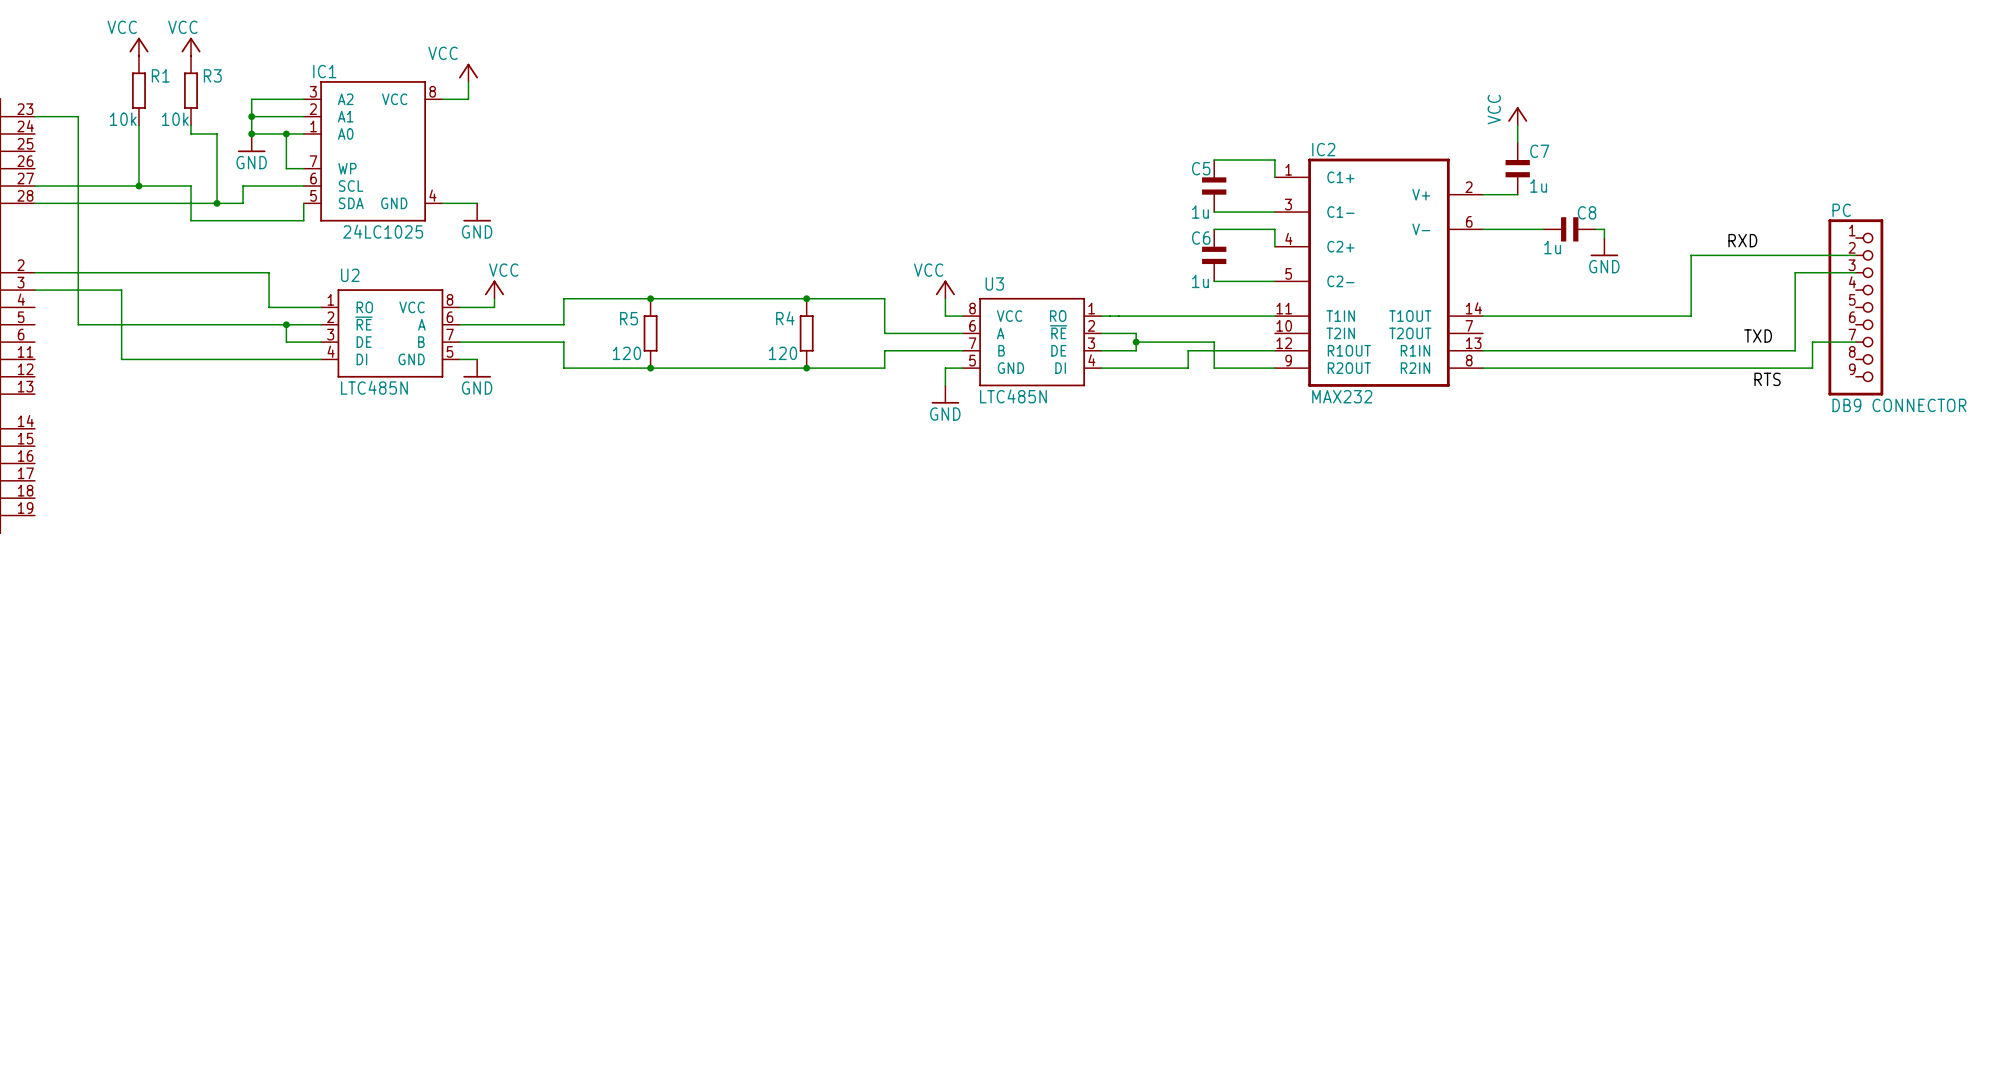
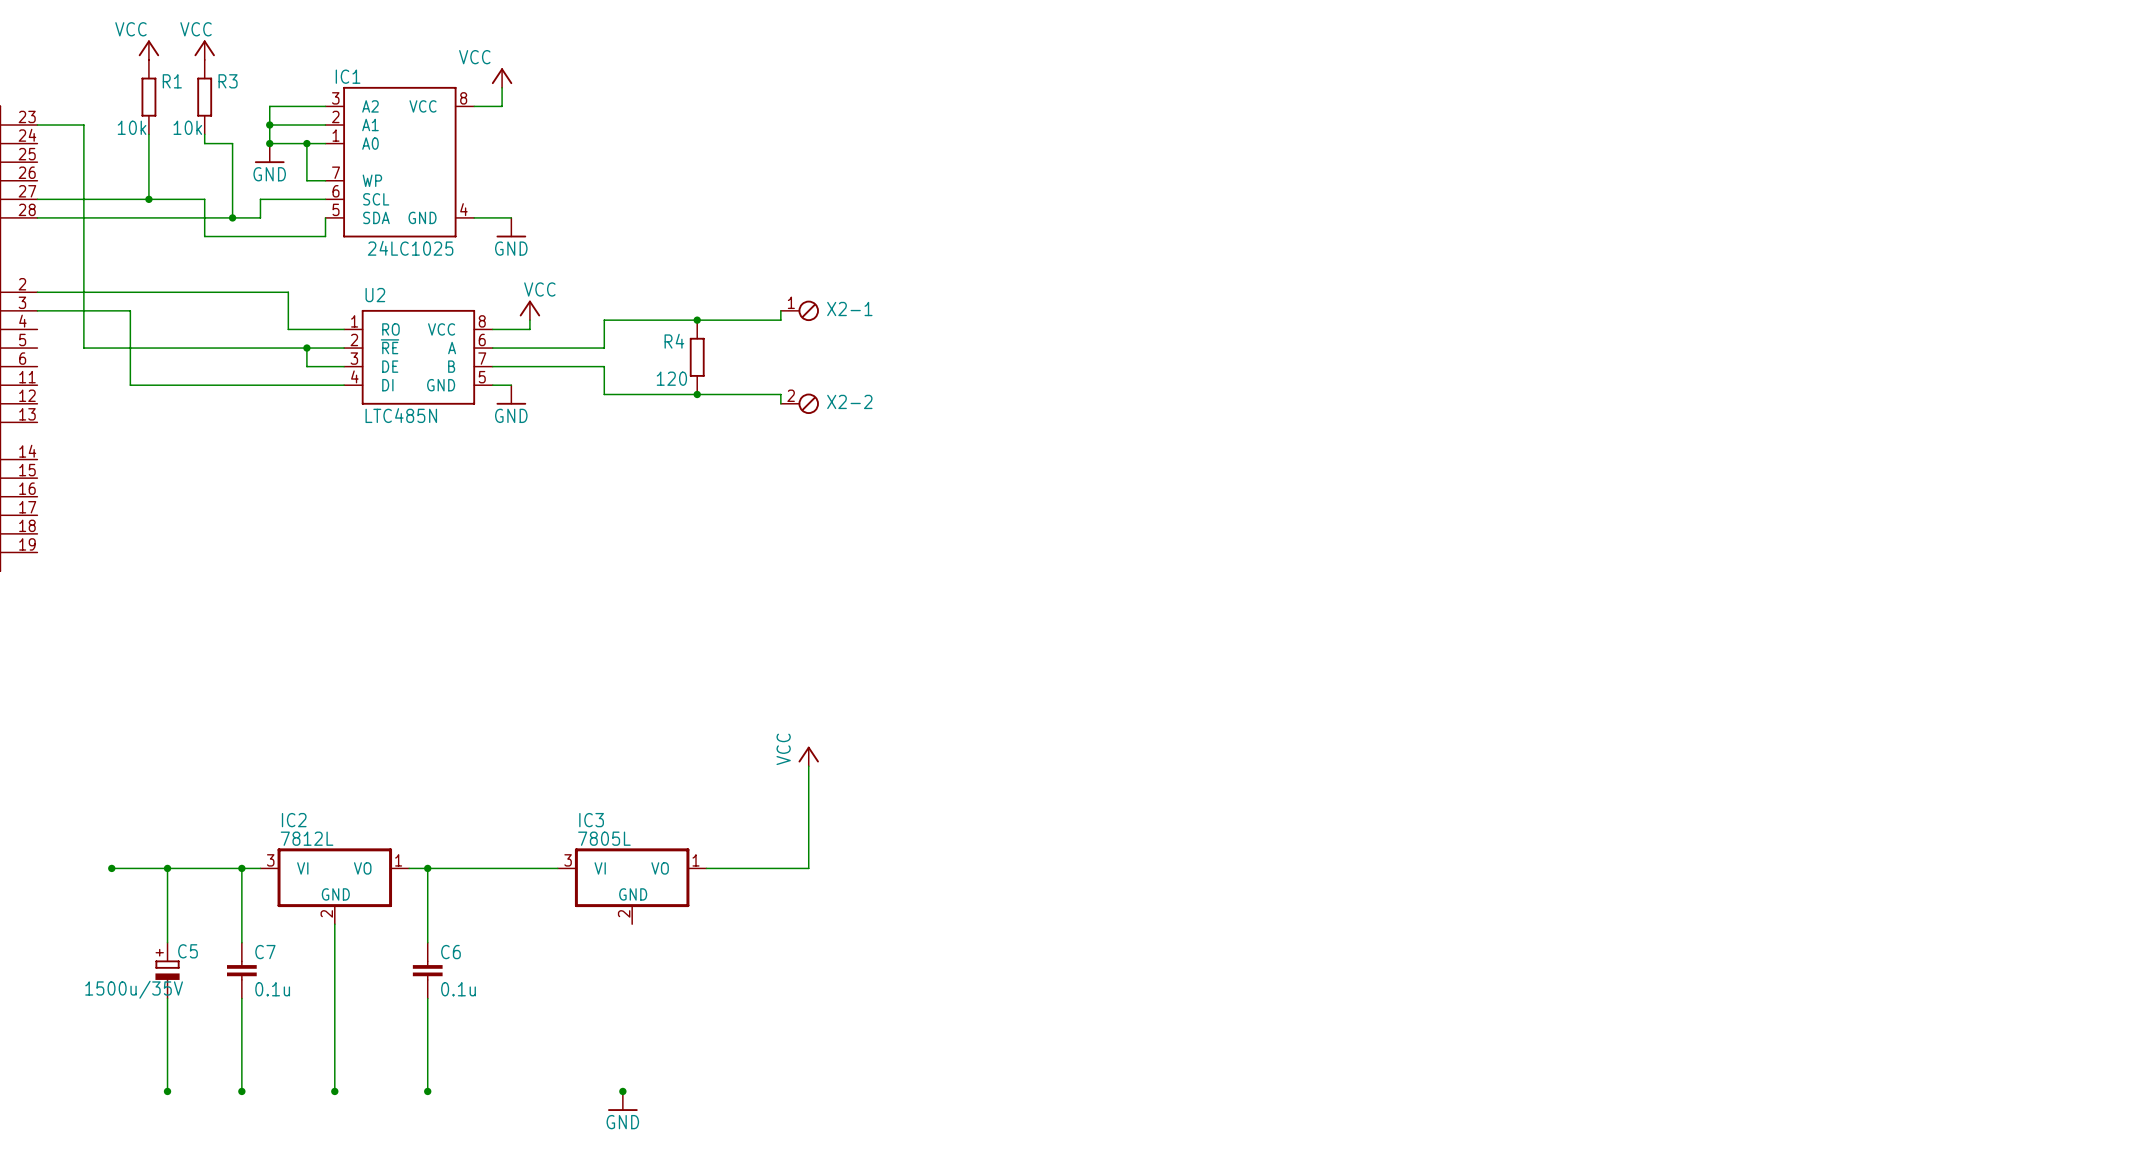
power symbol: VCC (1517, 116) -> none
wire: (1517, 125) (1517, 142) -> none
C7 symbol: [1505, 142, 1530, 195] -> [227, 942, 257, 999]
IC2 name position: IC2 (1323, 149) -> IC2 (294, 820)
IC2 symbol: [1274, 158, 1484, 387] -> [260, 848, 410, 925]
C5 symbol: [1202, 160, 1227, 213] -> [155, 942, 180, 999]
wire: (1214, 160) (1274, 160) (1274, 177) -> none
C5 name position: C5 (1201, 168) -> C5 (188, 951)
C7 value: 1u (1538, 186) -> 0.1u (272, 989)
wire: (1483, 194) (1517, 194) -> none
C5 value: 1u (1200, 212) -> 1500u/35V (134, 989)
wire: (1214, 212) (1274, 212) -> none
C6 symbol: [1202, 229, 1227, 282] -> [412, 942, 443, 999]
wire: (1214, 229) (1274, 229) (1274, 246) -> none
wire: (1483, 229) (1543, 229) -> none
C8: 1u (1569, 229) -> none
wire: (1595, 229) (1604, 229) (1604, 238) -> none
C6 name position: C6 (1201, 238) -> C6 (450, 952)
label: RXD (1742, 240) -> none
power symbol: GND (1604, 247) -> none
wire: (1855, 255) (1691, 255) (1691, 316) (1483, 316) -> none
wire: (1855, 272) (1795, 272) (1795, 350) (1483, 350) -> none
C6 value: 1u (1200, 281) -> 0.1u (458, 989)
wire: (1214, 281) (1274, 281) -> none
power symbol: VCC (945, 289) -> none
X2-1: none -> (799, 310)
wire: (728, 298) (884, 298) (884, 333) (962, 333) -> (780, 320) (780, 310)
junction: (806, 298) -> none
wire: (945, 298) (945, 316) (962, 316) -> none
PC: DB9 CONNECTOR (1855, 307) -> none
wire: (1101, 316) (1274, 316) -> none
R5 name: R5 (629, 318) -> R4 (674, 341)
R4: 120 (806, 333) -> none
wire: (1101, 333) (1136, 333) (1136, 350) (1101, 350) -> none
label: TXD (1758, 336) -> none
U3: LTC485N (1032, 342) -> none
wire: (1136, 342) (1214, 342) (1214, 368) (1274, 368) -> none
junction: (1136, 342) -> none
wire: (1855, 342) (1812, 342) (1812, 368) (1483, 368) -> none
wire: (962, 350) (884, 350) (884, 368) (728, 368) -> (780, 403) (780, 394)
wire: (1274, 350) (1188, 350) (1188, 368) (1101, 368) -> none
junction: (806, 368) -> none
wire: (962, 368) (945, 368) (945, 385) -> none
X2-2: none -> (799, 403)
label: RTS (1767, 379) -> none
power symbol: GND (945, 394) -> none
IC2 value: MAX232 (1342, 396) -> 7812L (307, 838)
power symbol: none -> VCC (808, 756)
wire: none -> (808, 766) (808, 868) (706, 868)
wire: none -> (111, 868) (260, 868)
junction: none -> (111, 868)
wire: none -> (167, 868) (167, 942)
junction: none -> (167, 868)
wire: none -> (241, 868) (241, 942)
junction: none -> (241, 868)
wire: none -> (409, 868) (557, 868)
wire: none -> (427, 868) (427, 942)
junction: none -> (427, 868)
IC3: none -> 7805L (632, 886)
wire: none -> (334, 924) (334, 1091)
wire: none -> (167, 998) (167, 1091)
wire: none -> (241, 998) (241, 1091)
wire: none -> (427, 998) (427, 1091)
junction: none -> (167, 1091)
junction: none -> (241, 1091)
junction: none -> (334, 1091)
junction: none -> (427, 1091)
junction: none -> (622, 1091)
power symbol: none -> GND (622, 1101)

